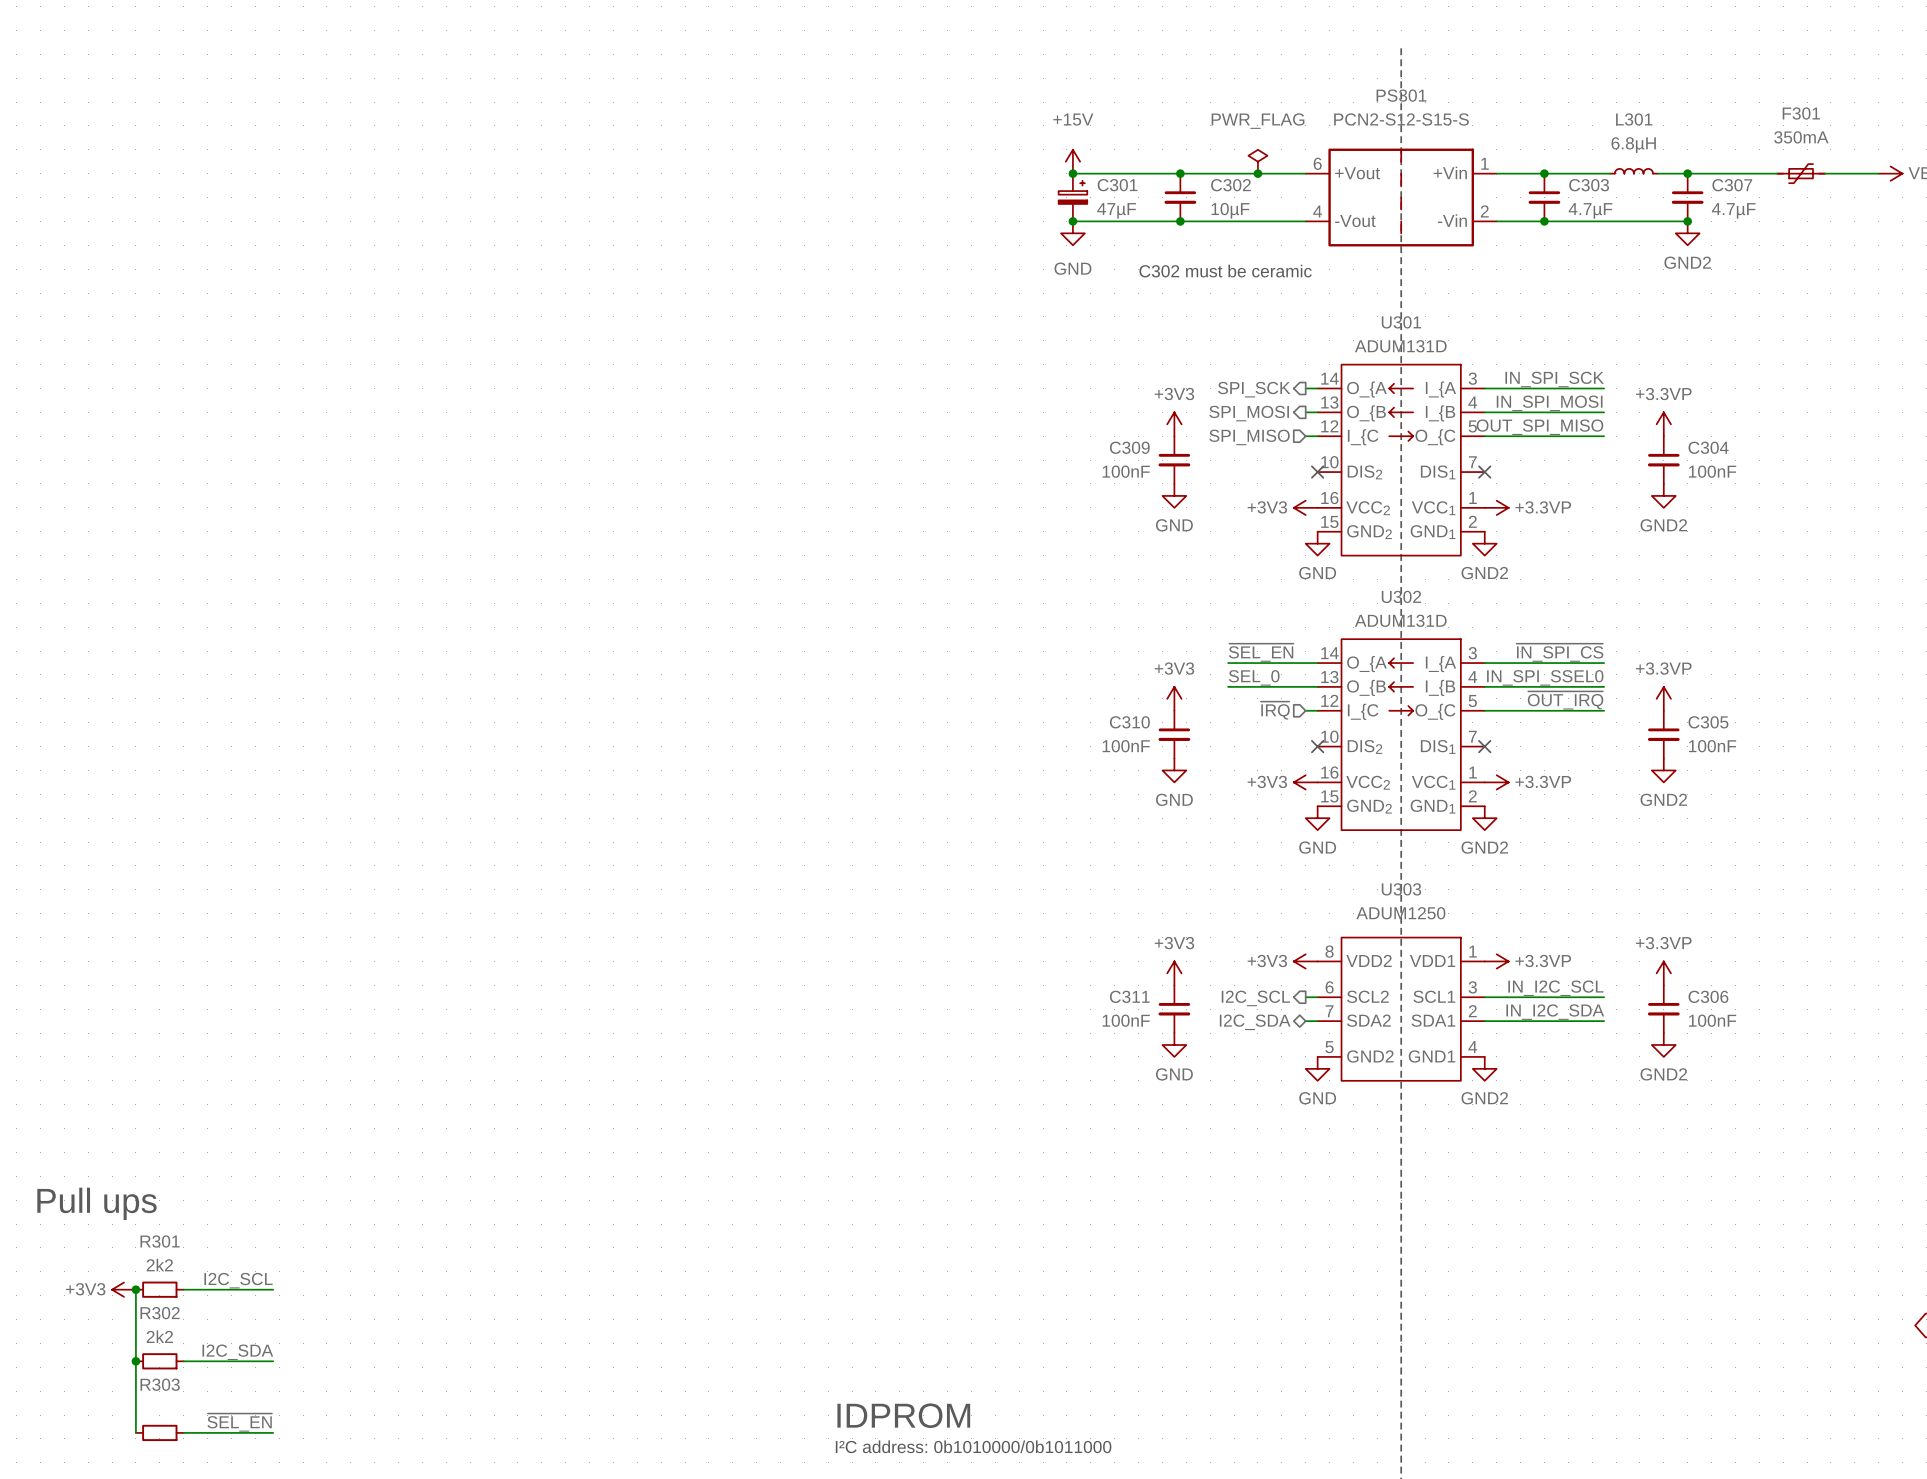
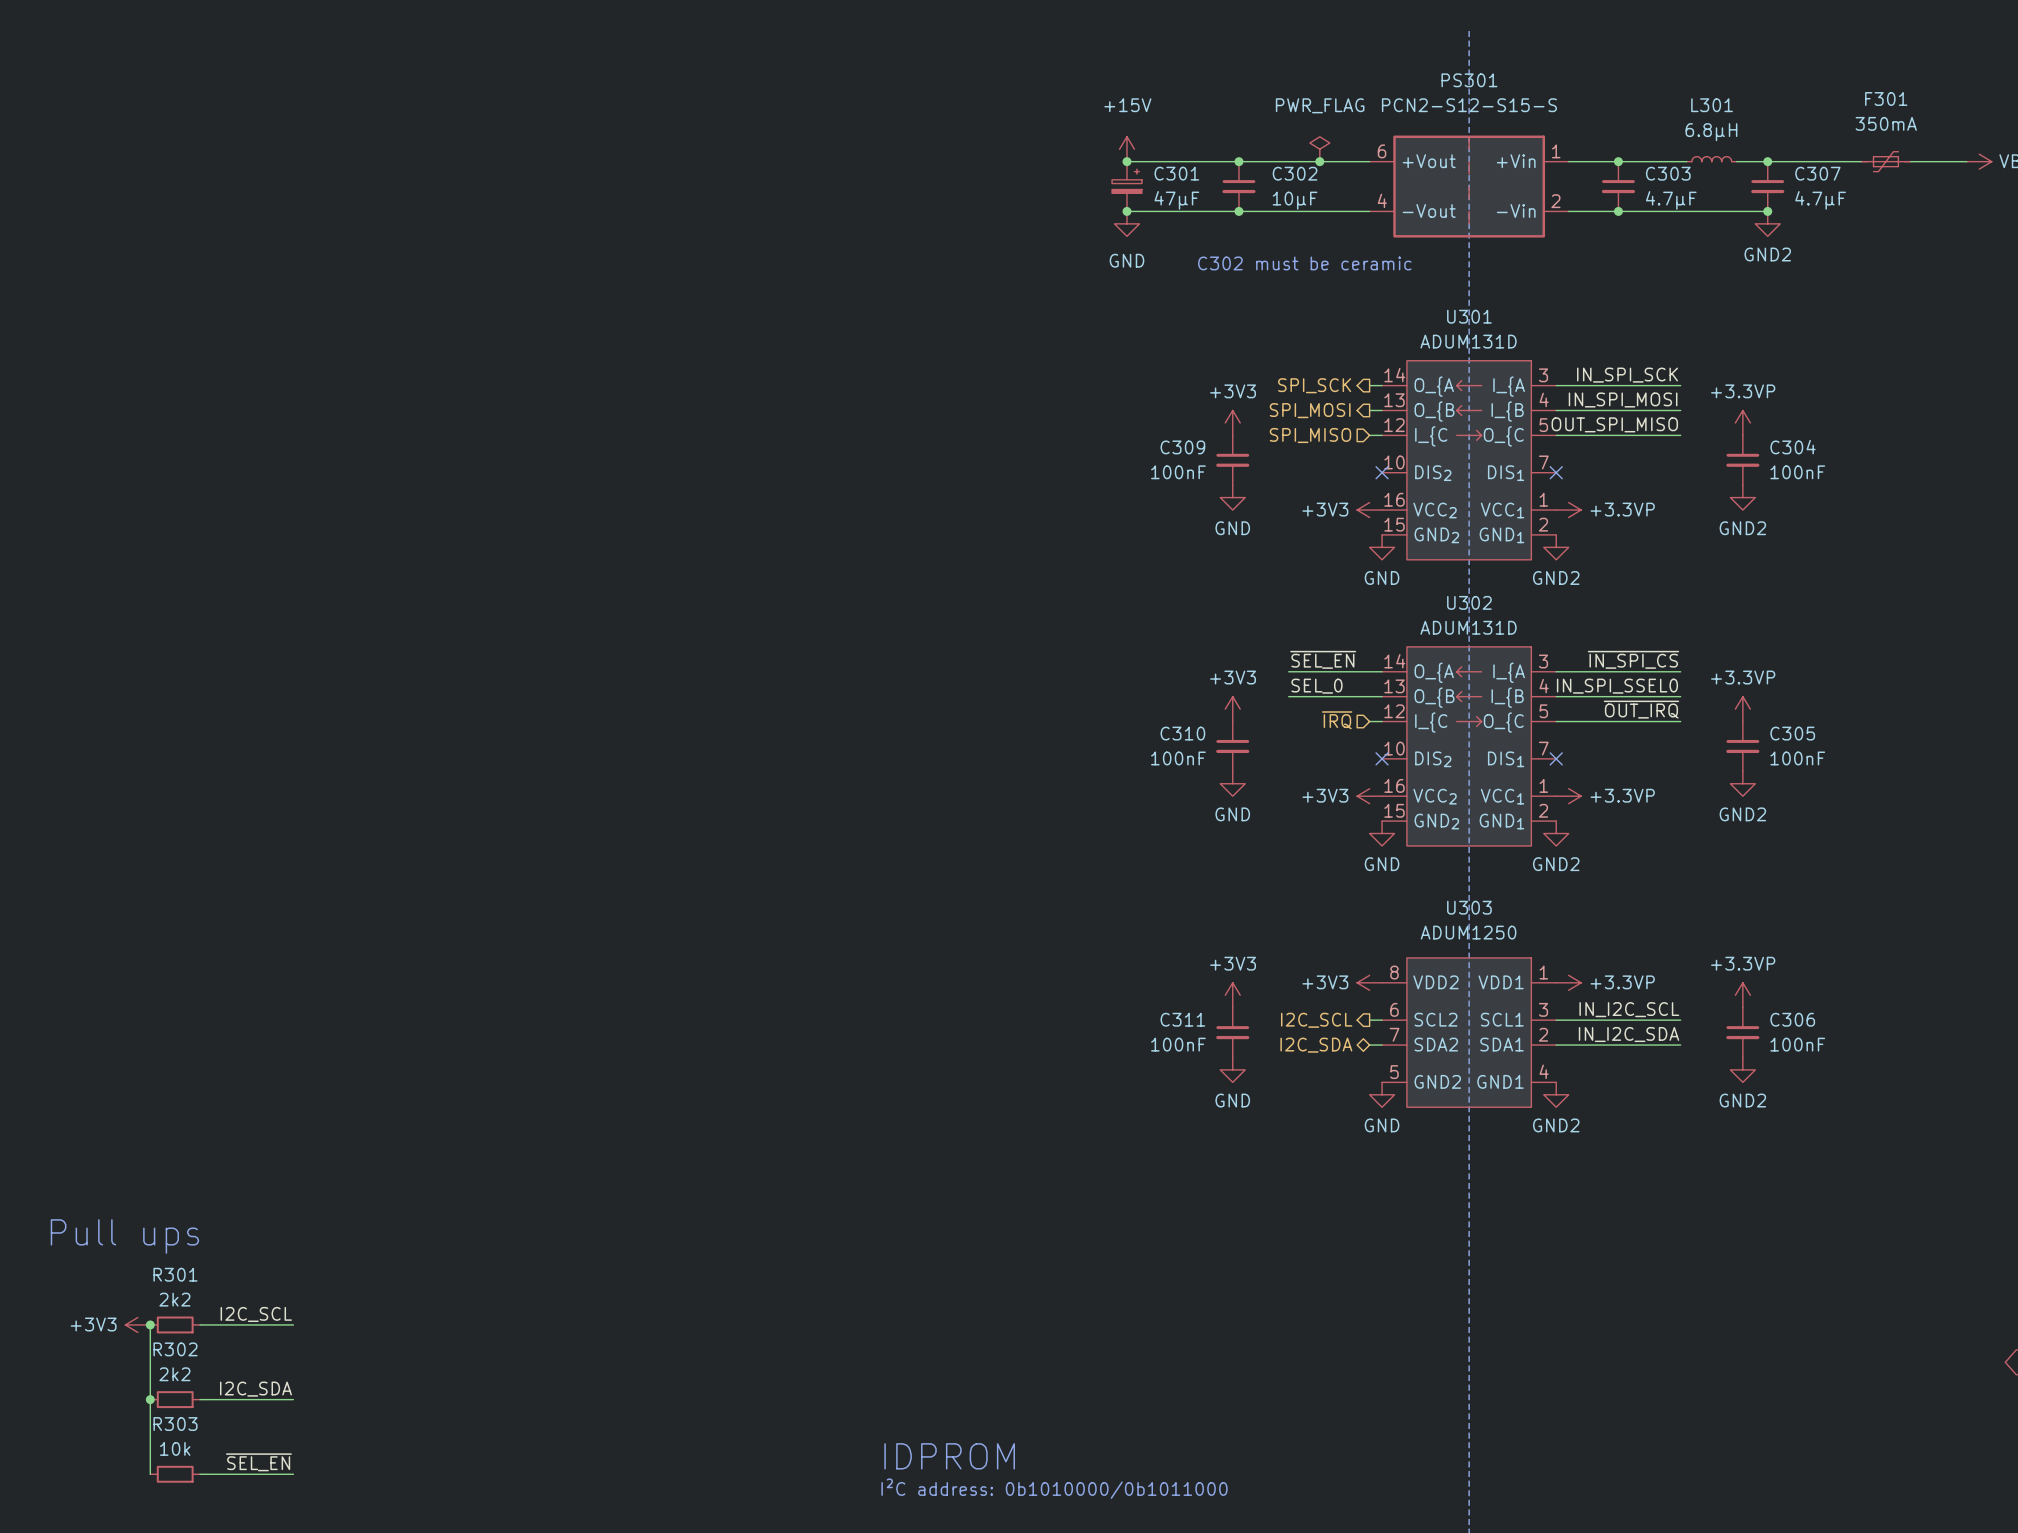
R303 value: none -> 10k (175, 1448)

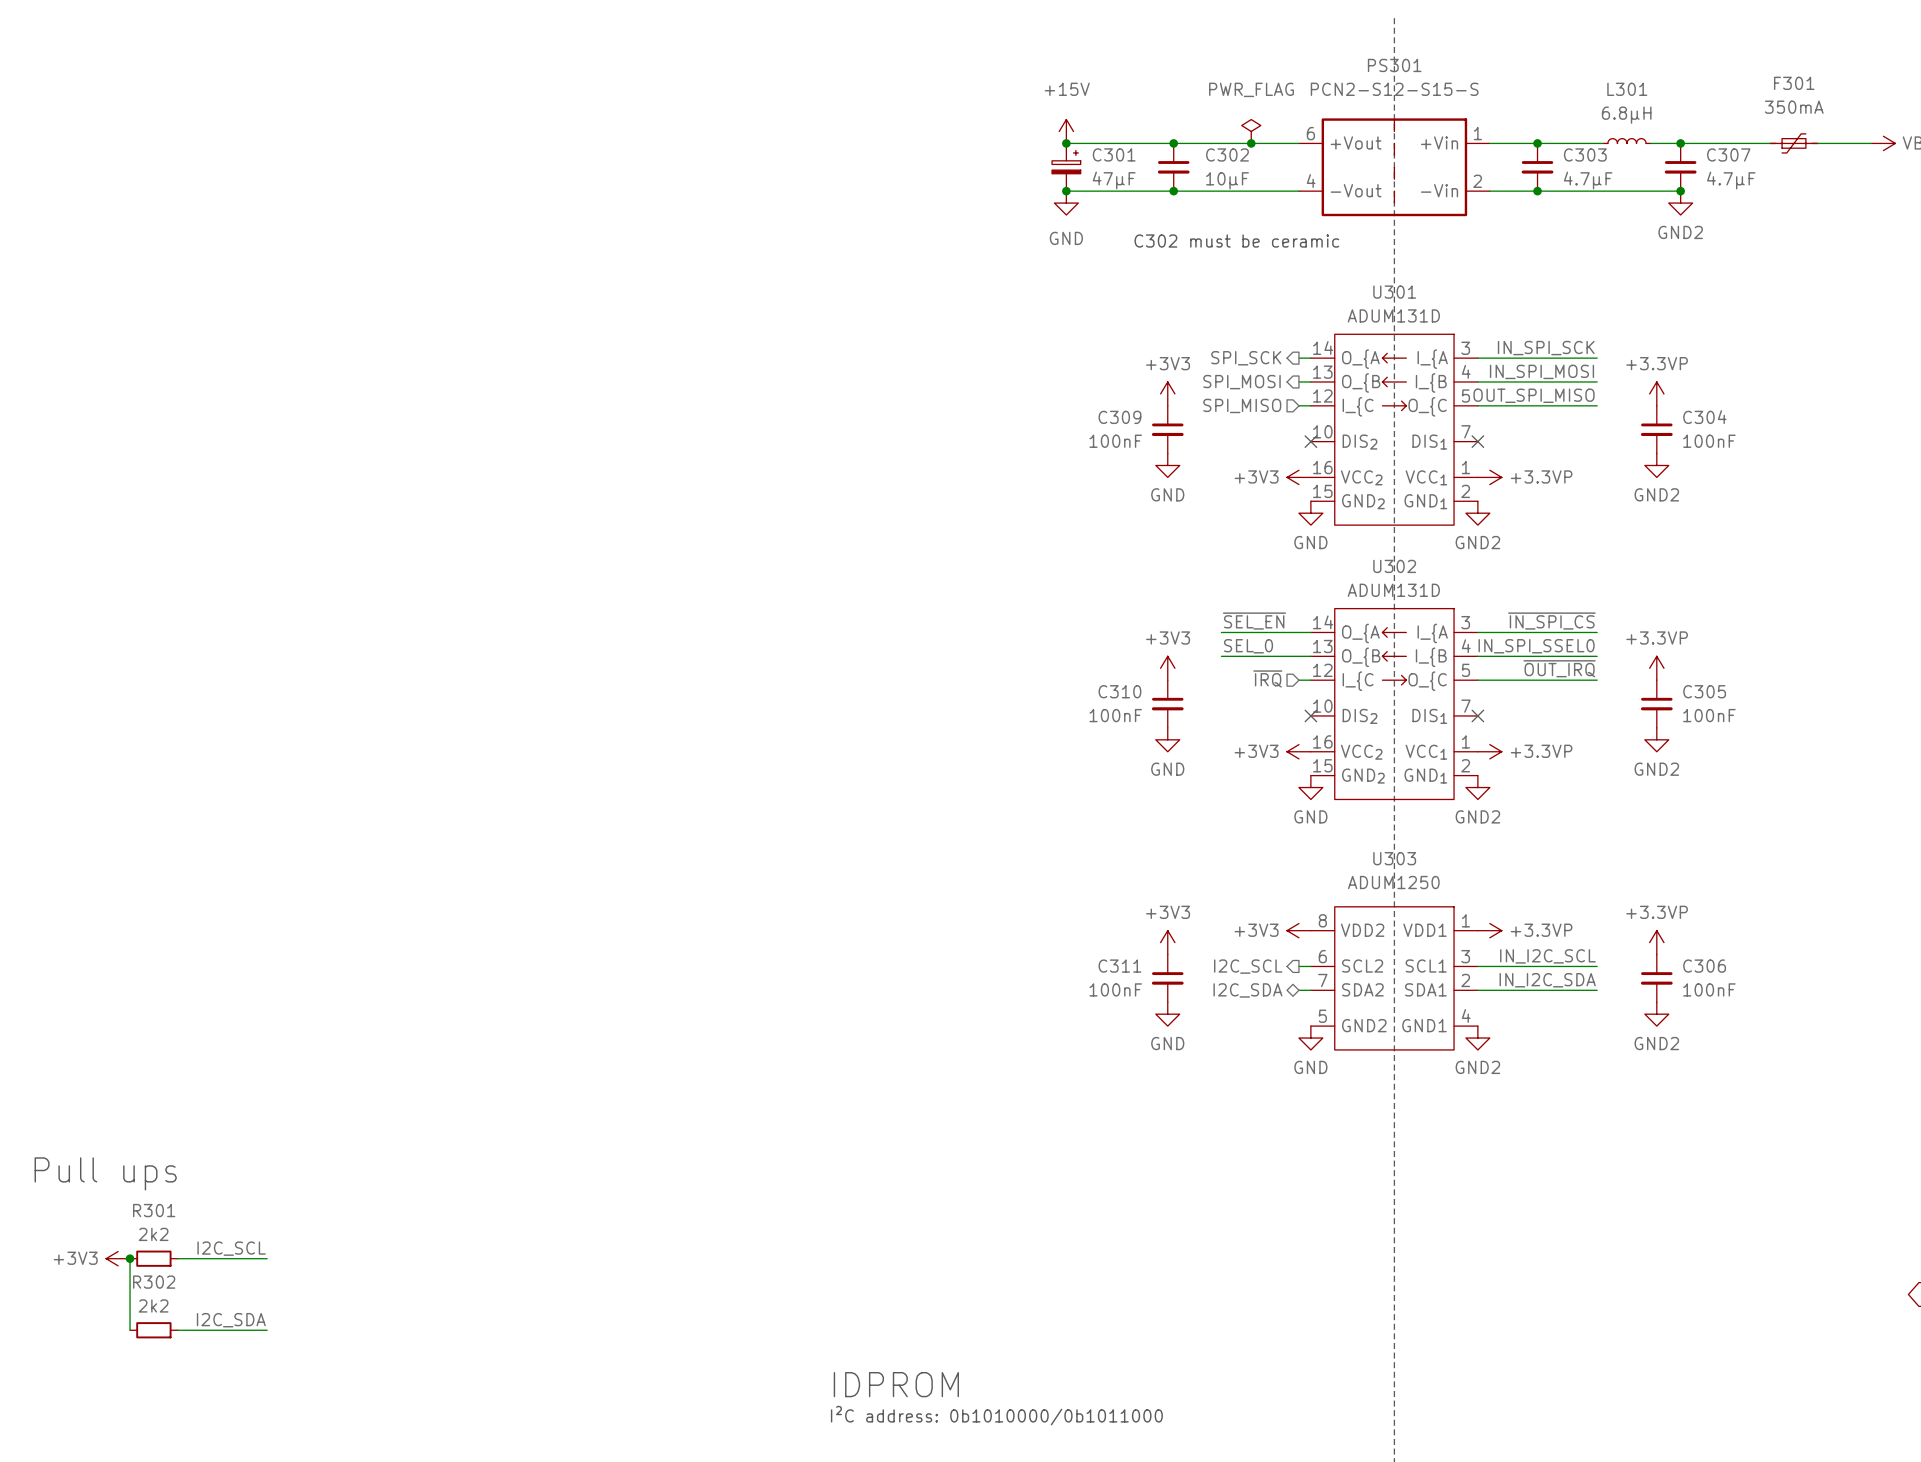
wire: (150, 1399) (150, 1474) -> none
junction: (150, 1399) -> none
label: ~{SEL_EN} (258, 1462) -> none
R303: 10k (175, 1474) -> none
wire: (200, 1474) (293, 1474) -> none

